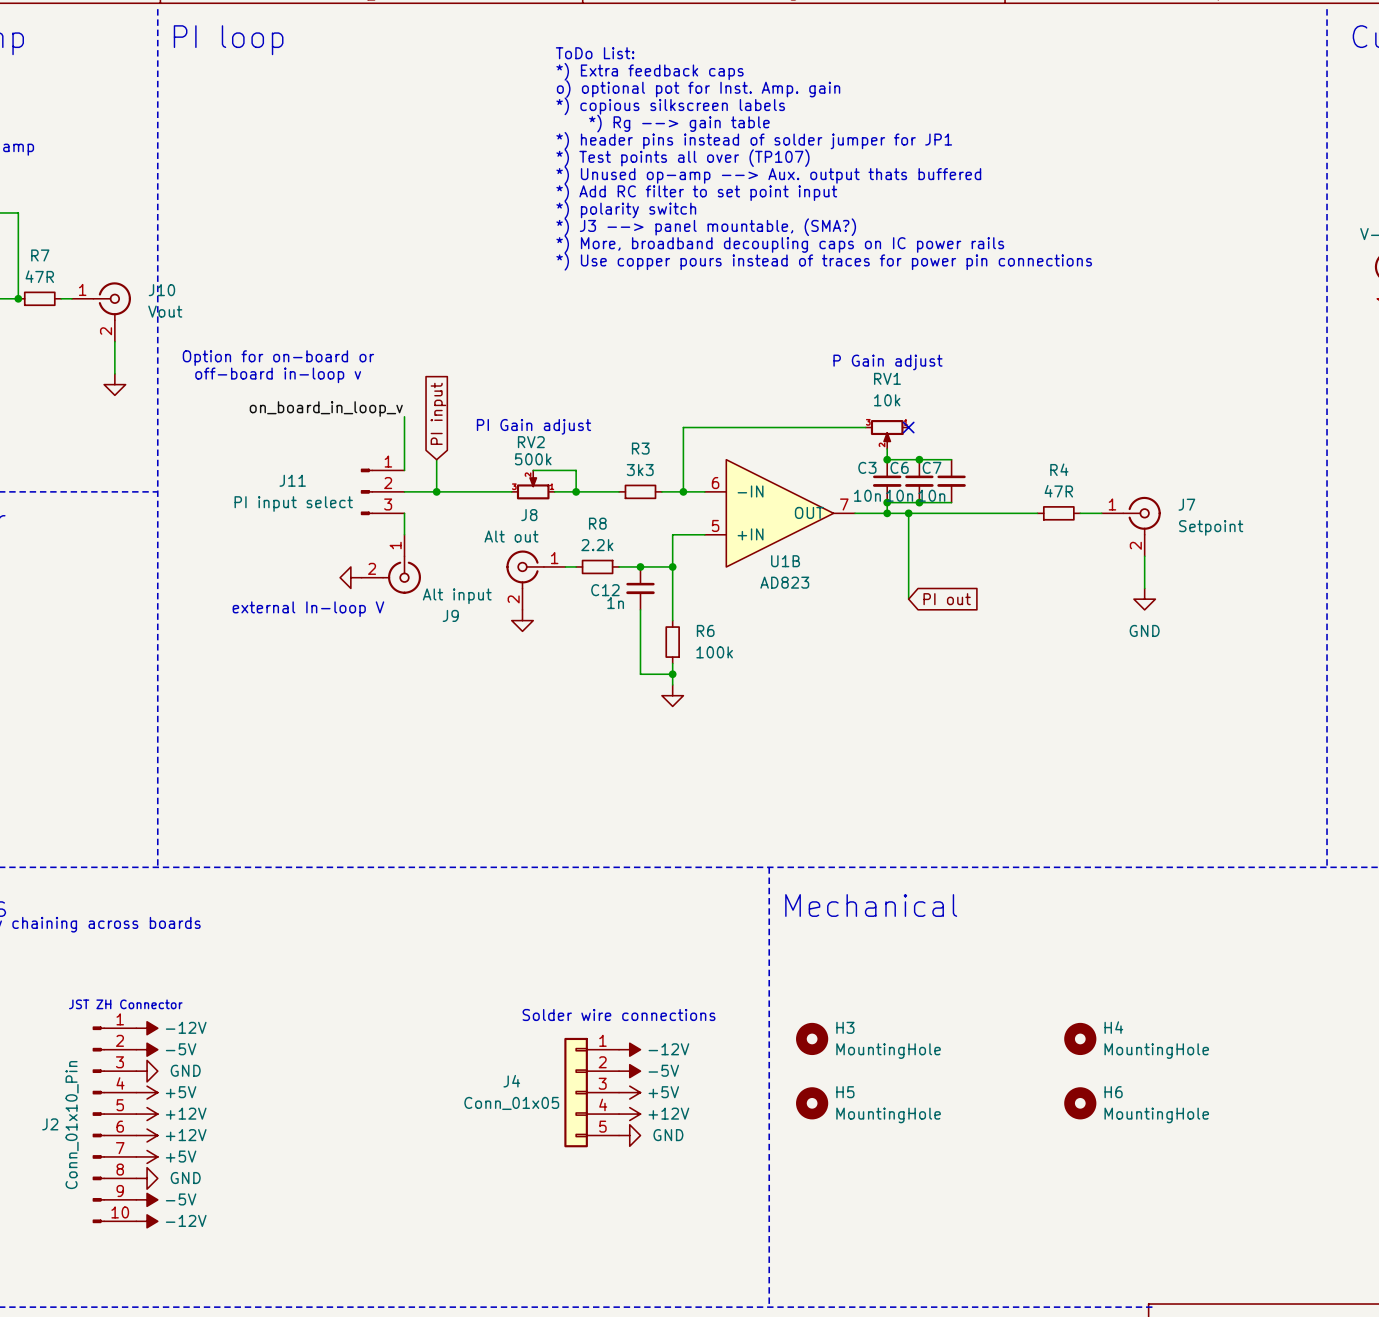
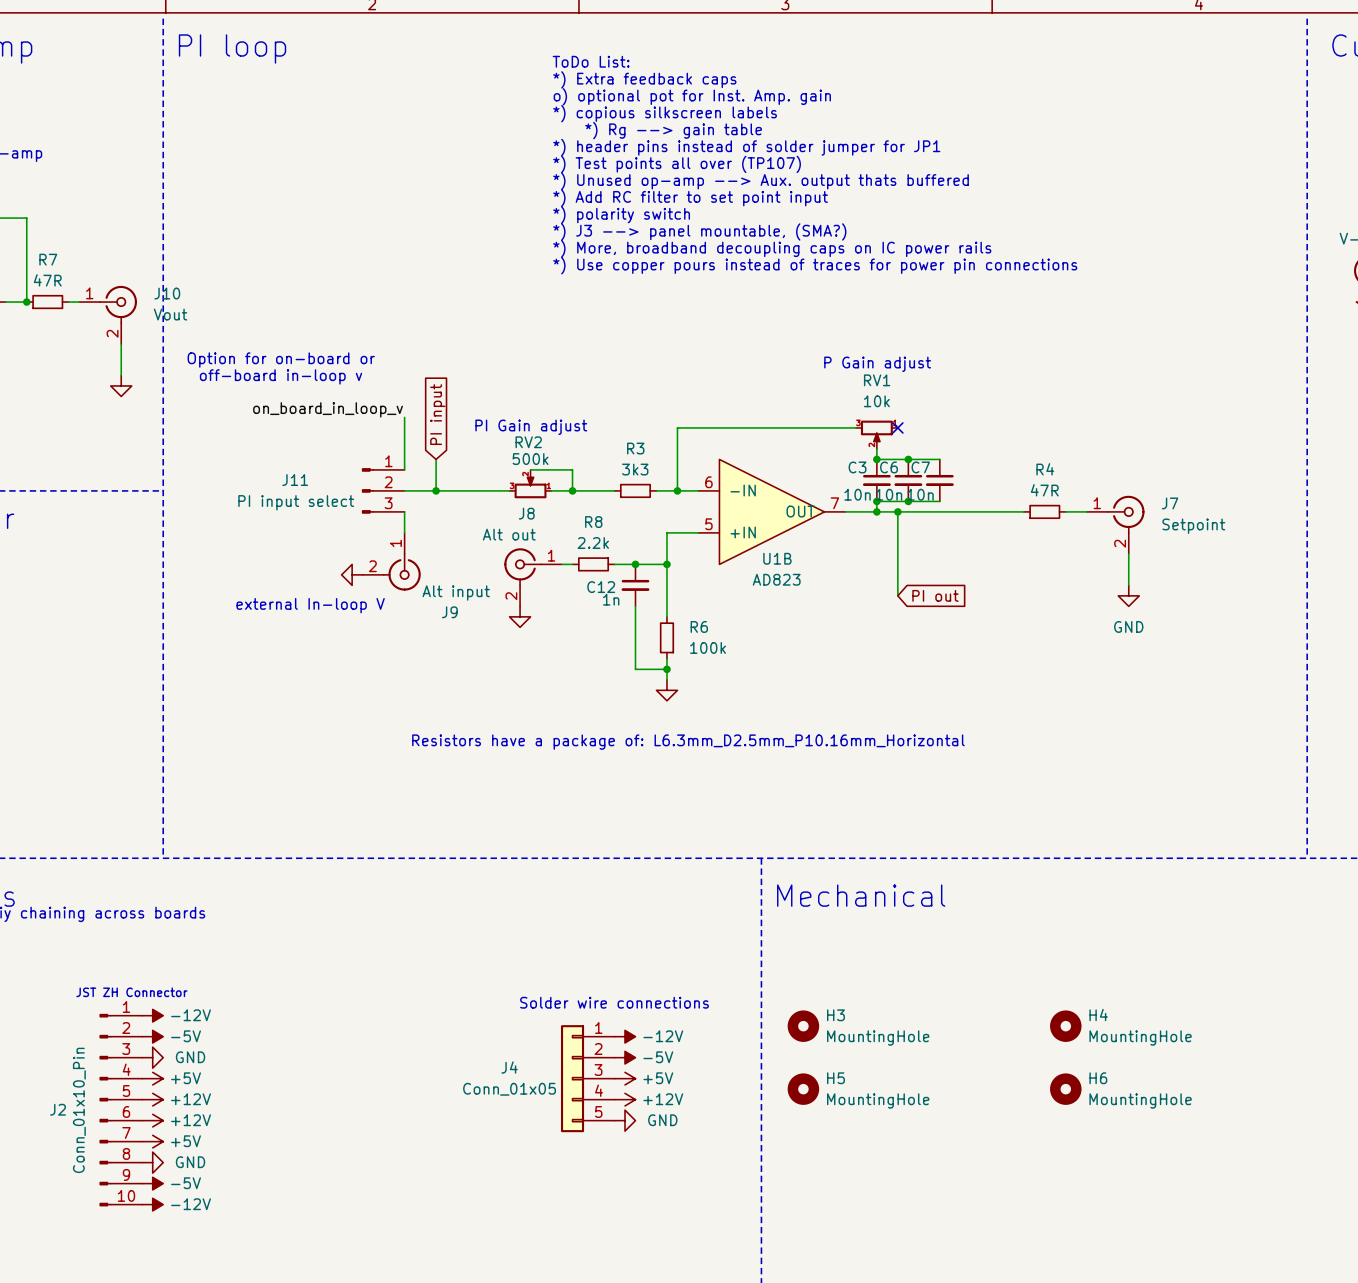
text: none -> Resistors have a package of: L6.3mm_D2.5mm_P10.16mm_Horizontal (688, 742)

